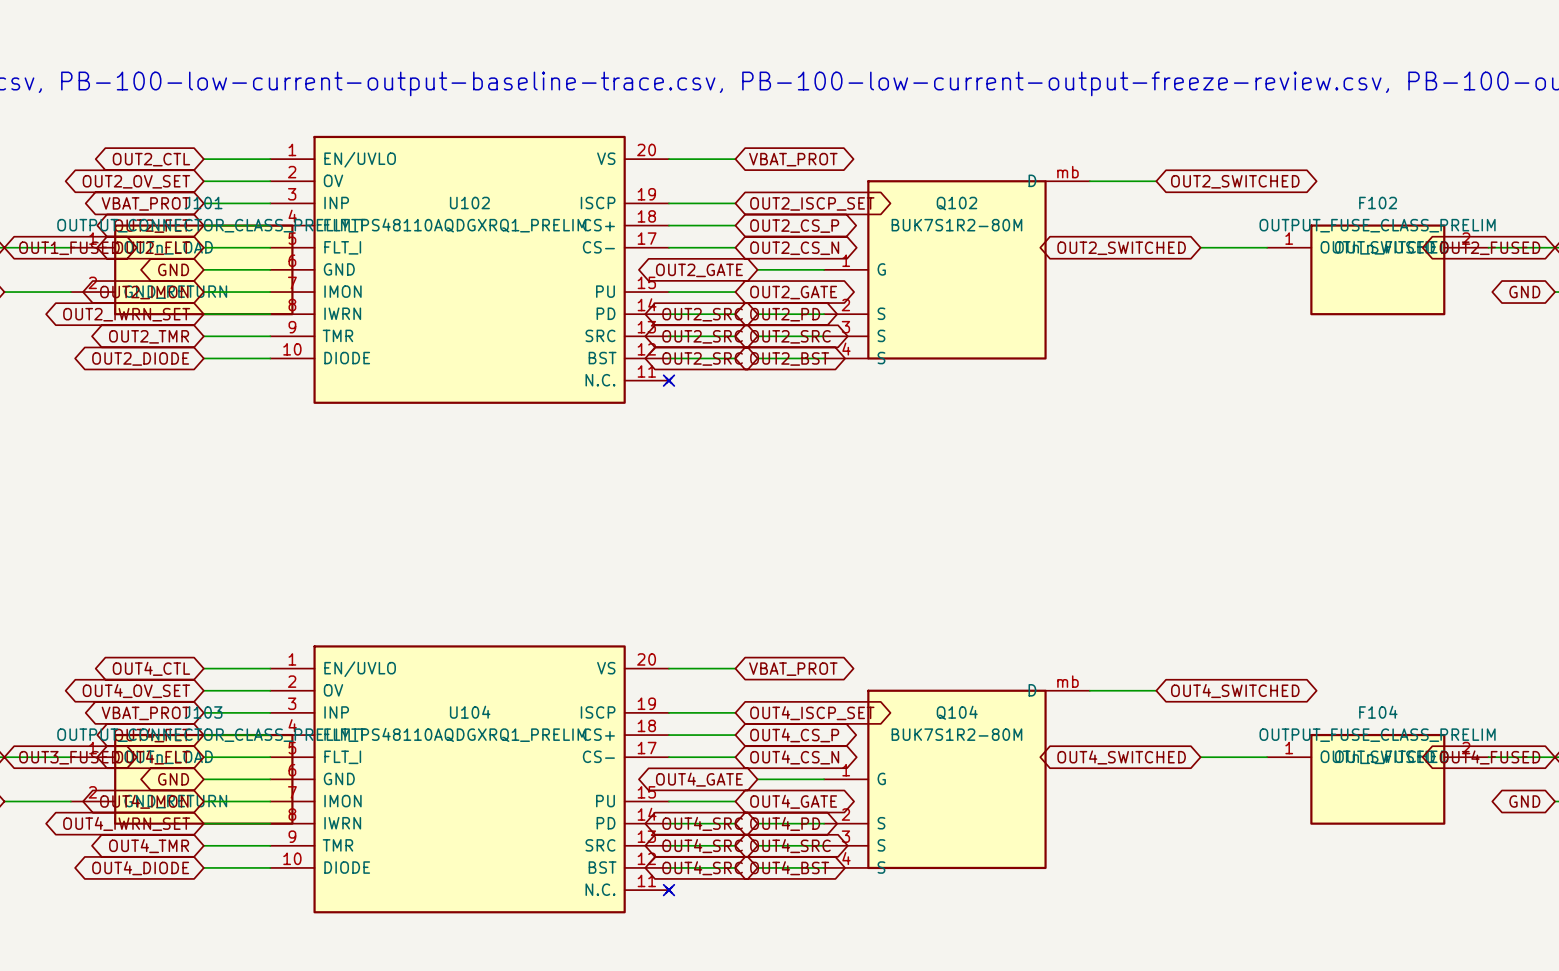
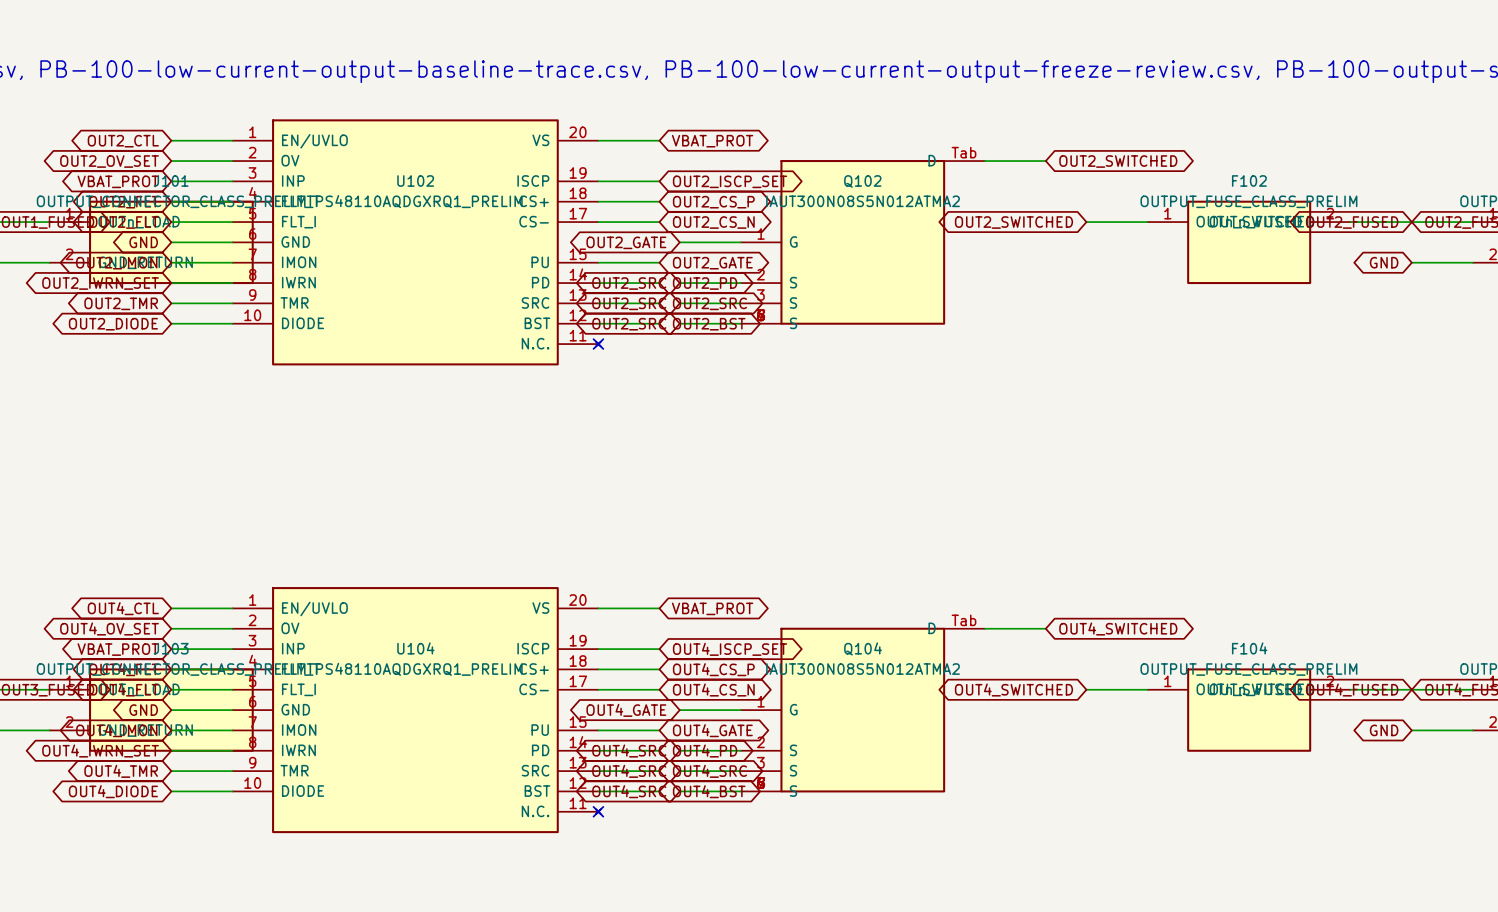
Q102 symbol: [824, 180, 1090, 360] -> [740, 160, 985, 325]
Q102 value: BUK7S1R2-80M (956, 225) -> IAUT300N08S5N012ATMA2 (863, 201)
Q104 symbol: [824, 689, 1090, 870] -> [740, 627, 985, 793]
Q104 value: BUK7S1R2-80M (956, 734) -> IAUT300N08S5N012ATMA2 (863, 669)

